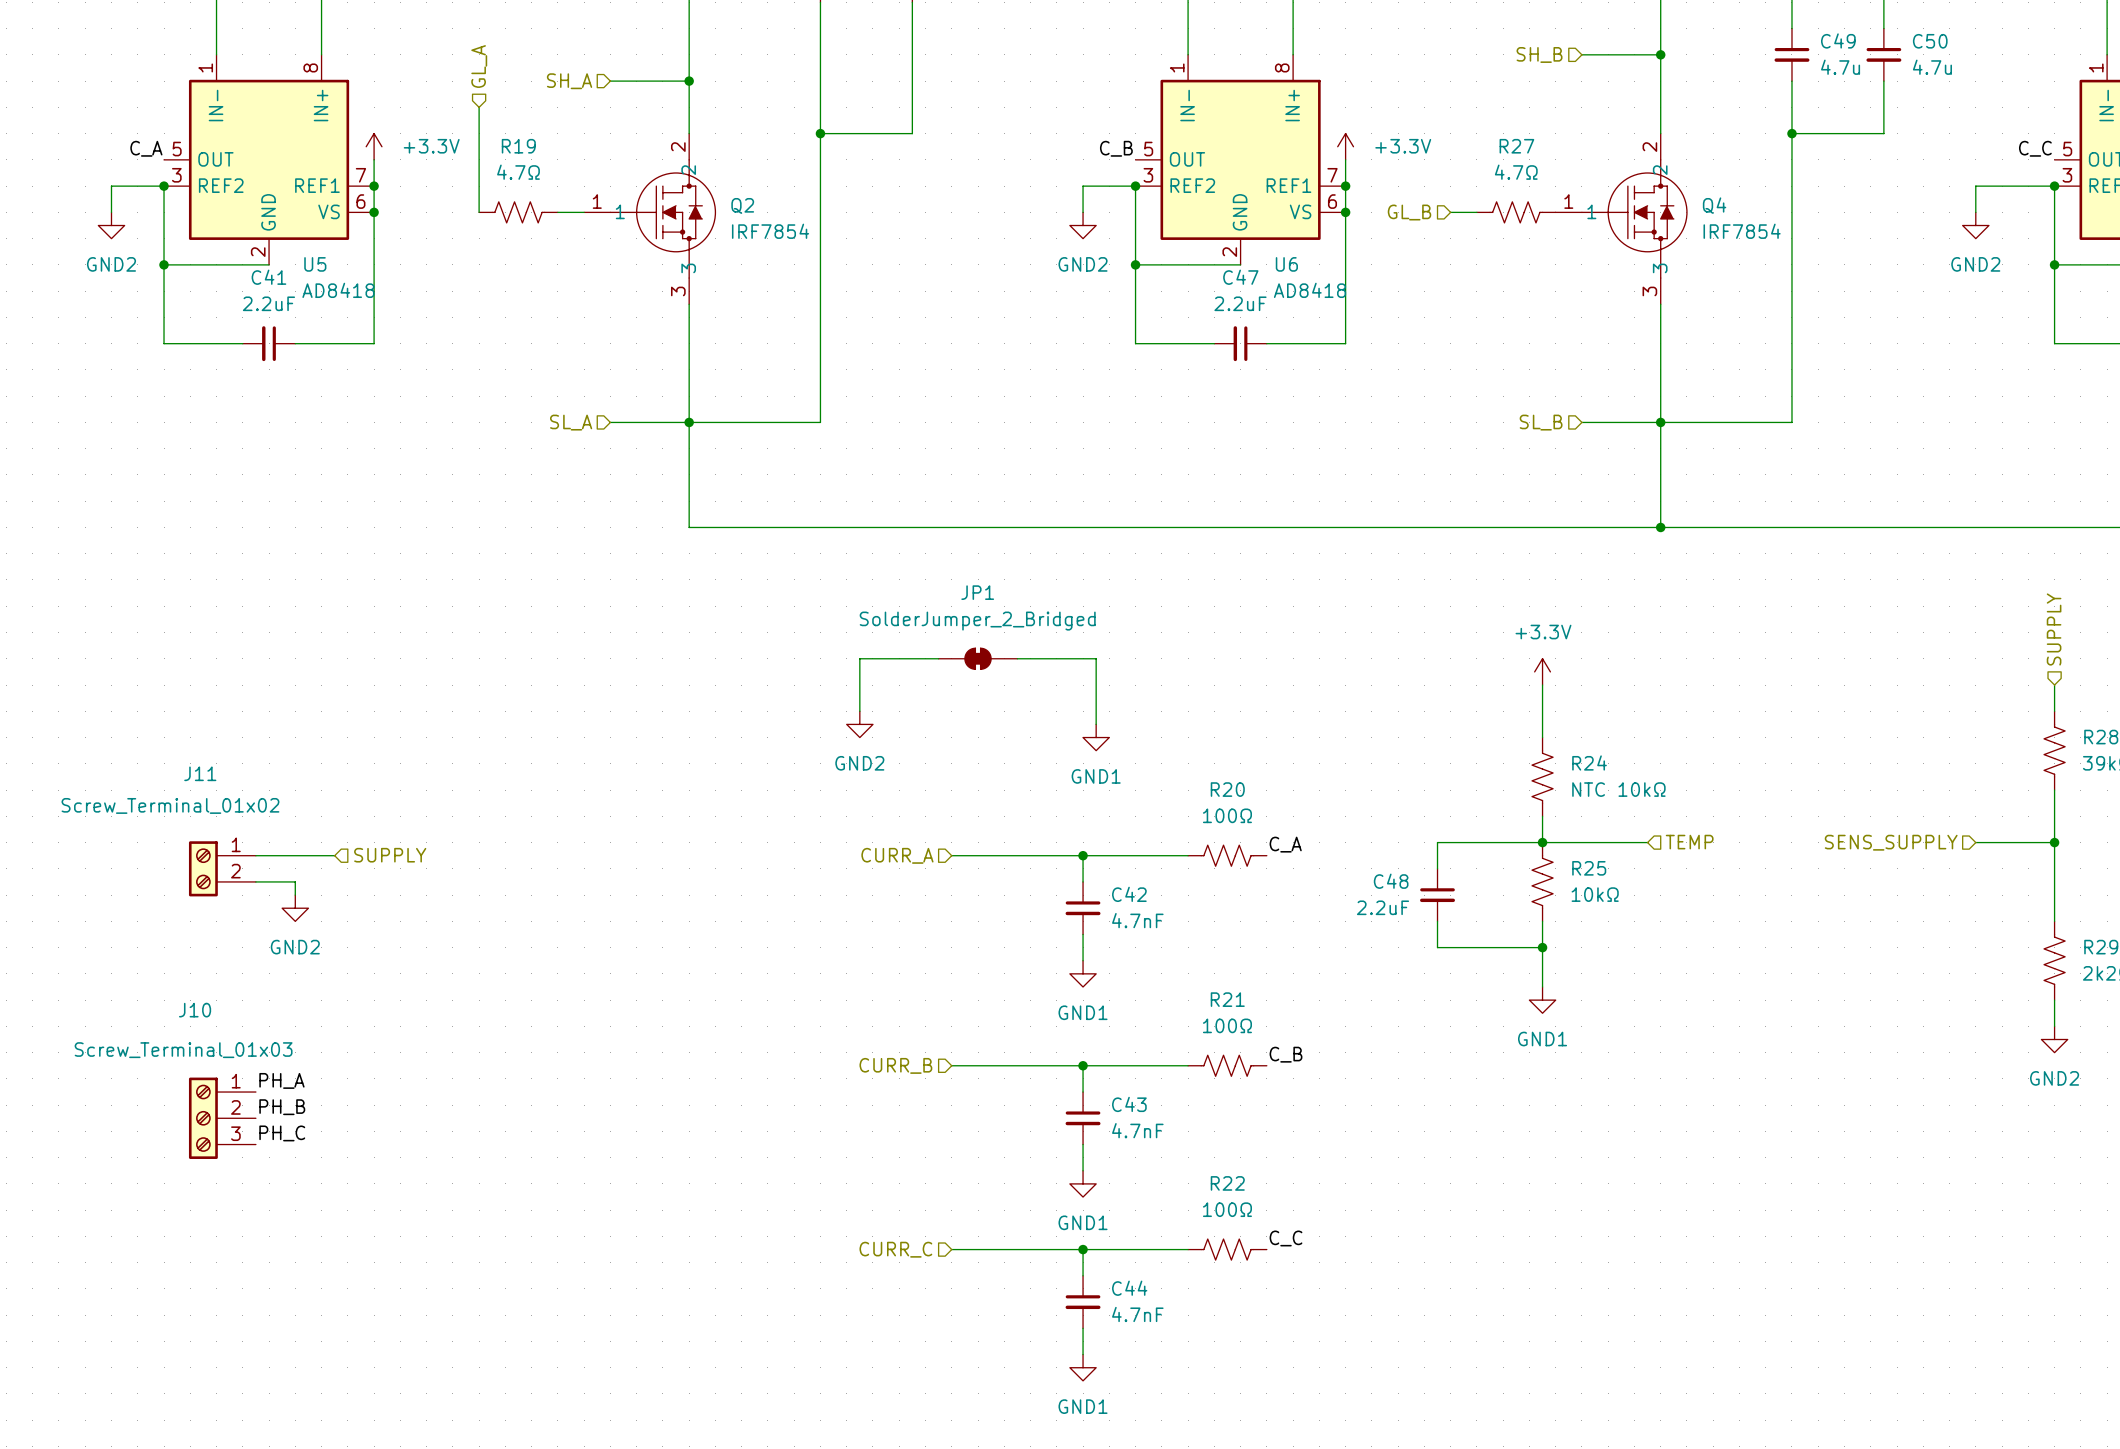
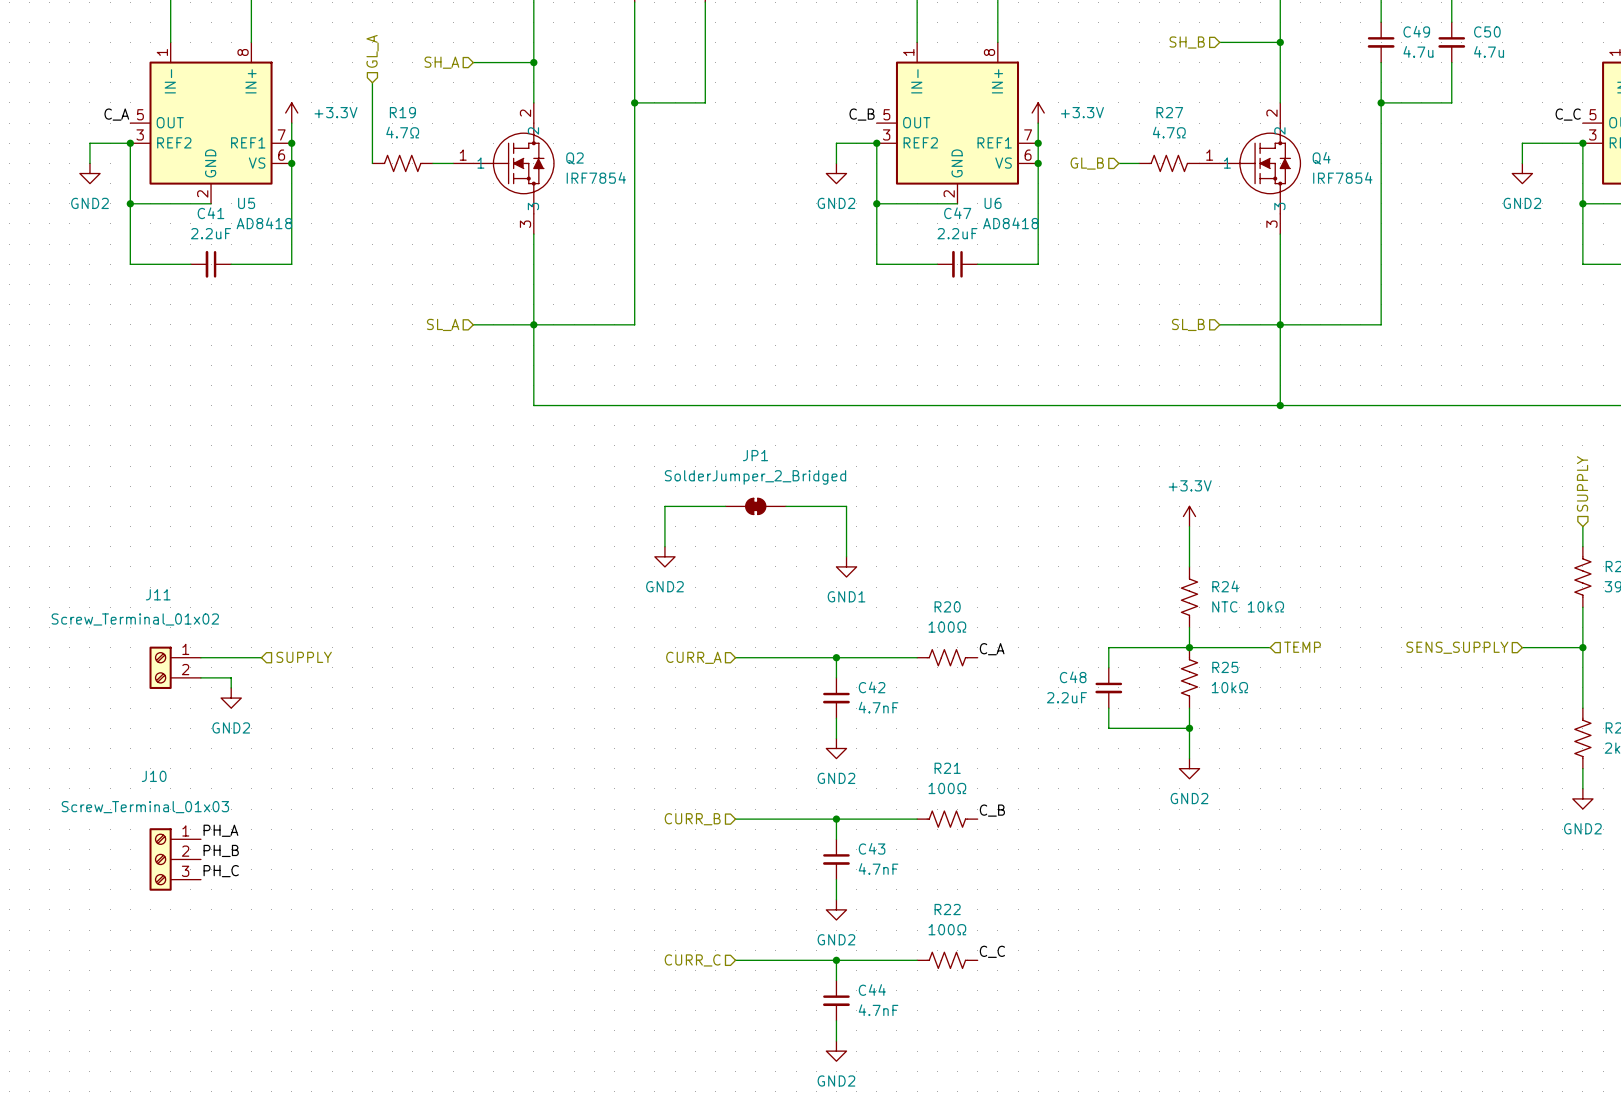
power symbol: GND1 (1083, 973) -> GND2 (836, 748)
power symbol: GND1 (1542, 1000) -> GND2 (1189, 768)
power symbol: GND1 (1083, 1183) -> GND2 (836, 909)
power symbol: GND1 (1083, 1367) -> GND2 (836, 1051)

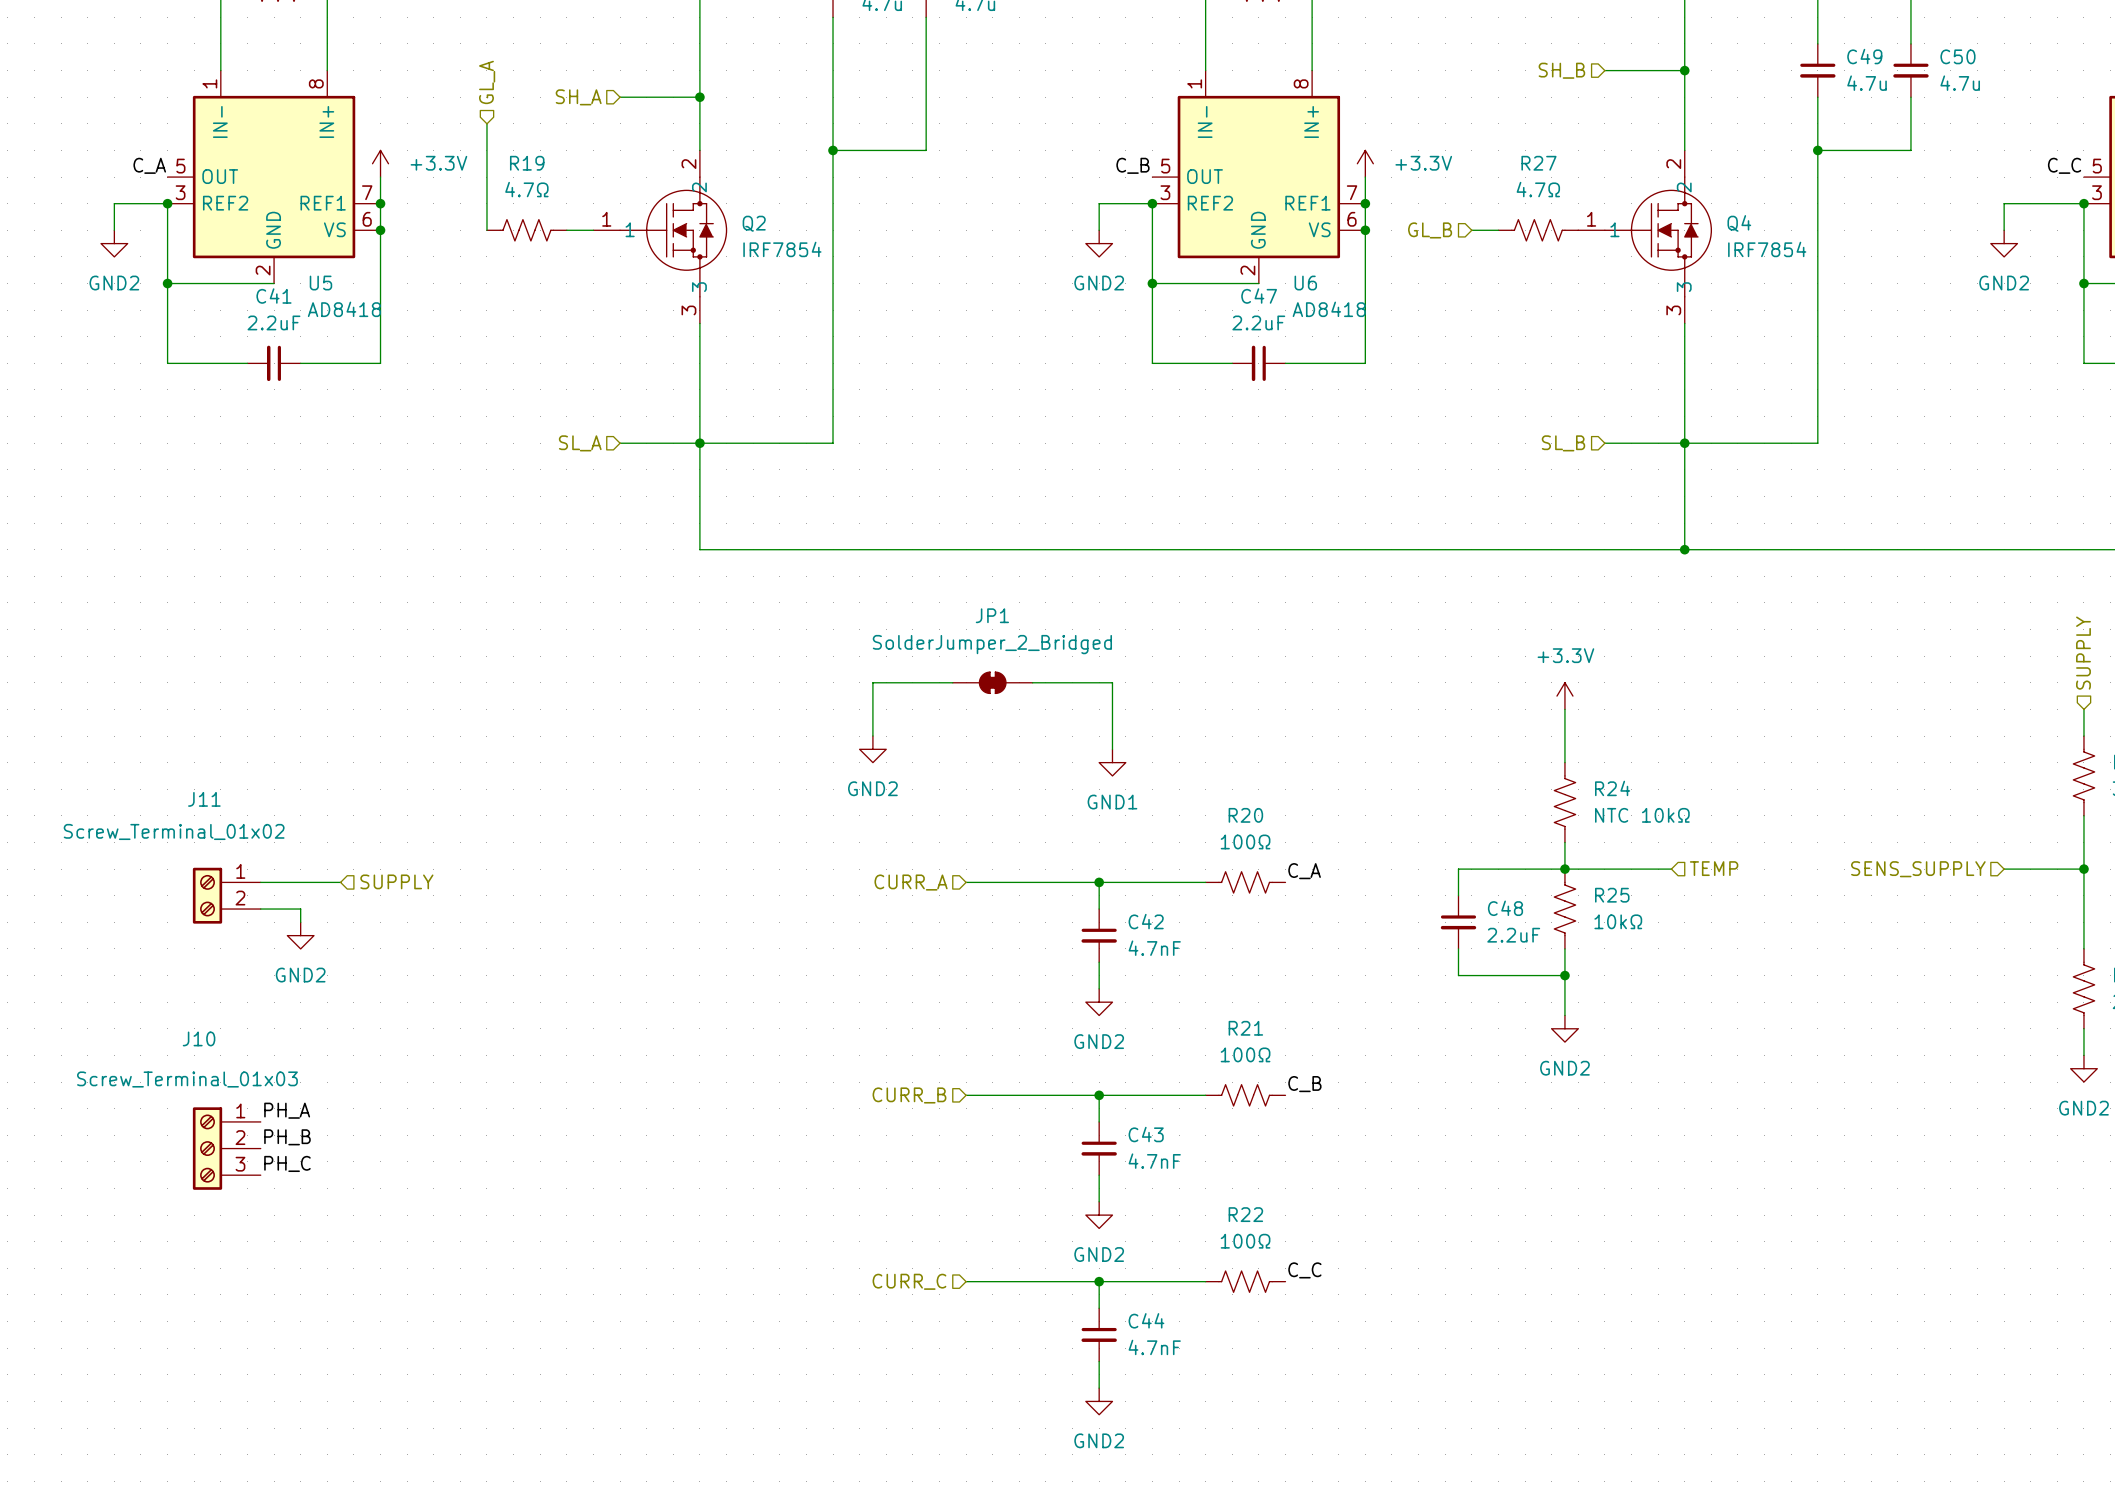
C48 name position: C48 (1073, 677) -> C48 (1505, 908)
C48 value position: 2.2uF (1066, 697) -> 2.2uF (1513, 935)

